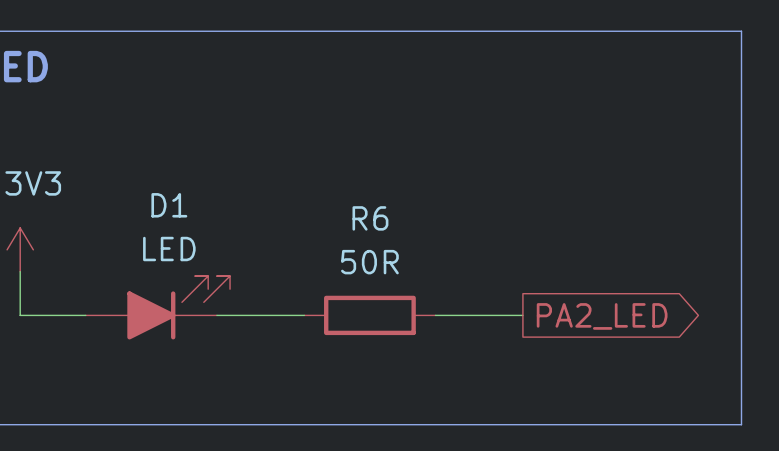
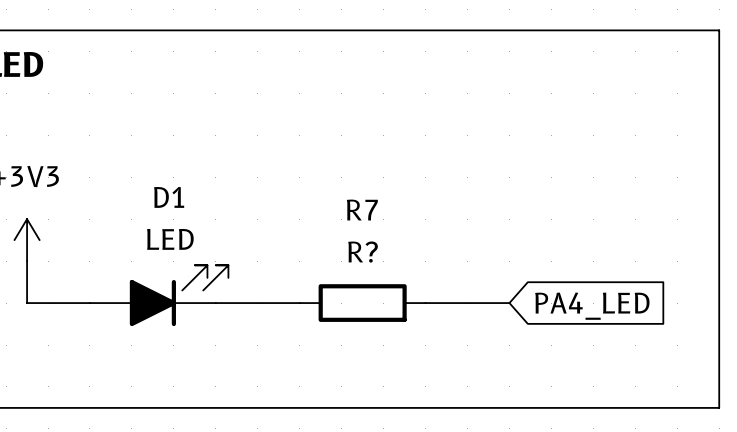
R6 name: R6 (370, 218) -> R7 (362, 210)
R6 value: 50R (369, 262) -> R? (363, 252)
global label shape: output (602, 316) -> input (592, 306)
global label: PA2_LED (602, 316) -> PA4_LED (592, 306)

